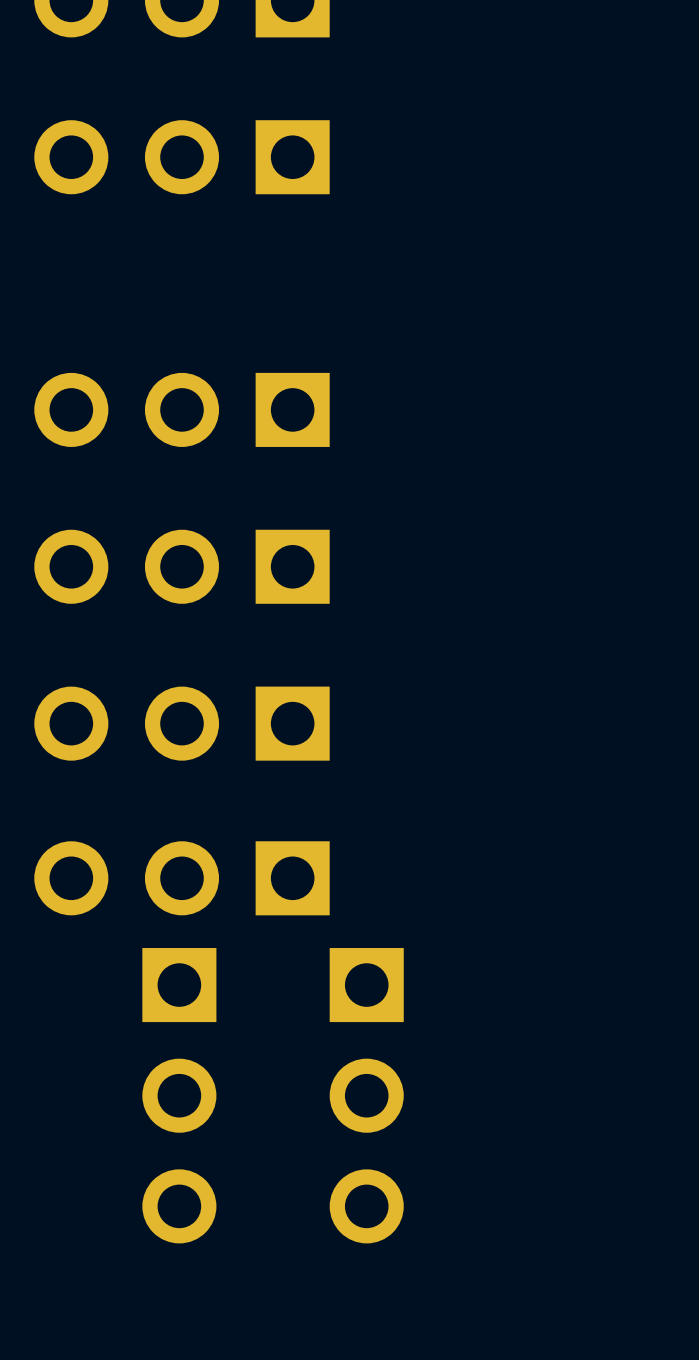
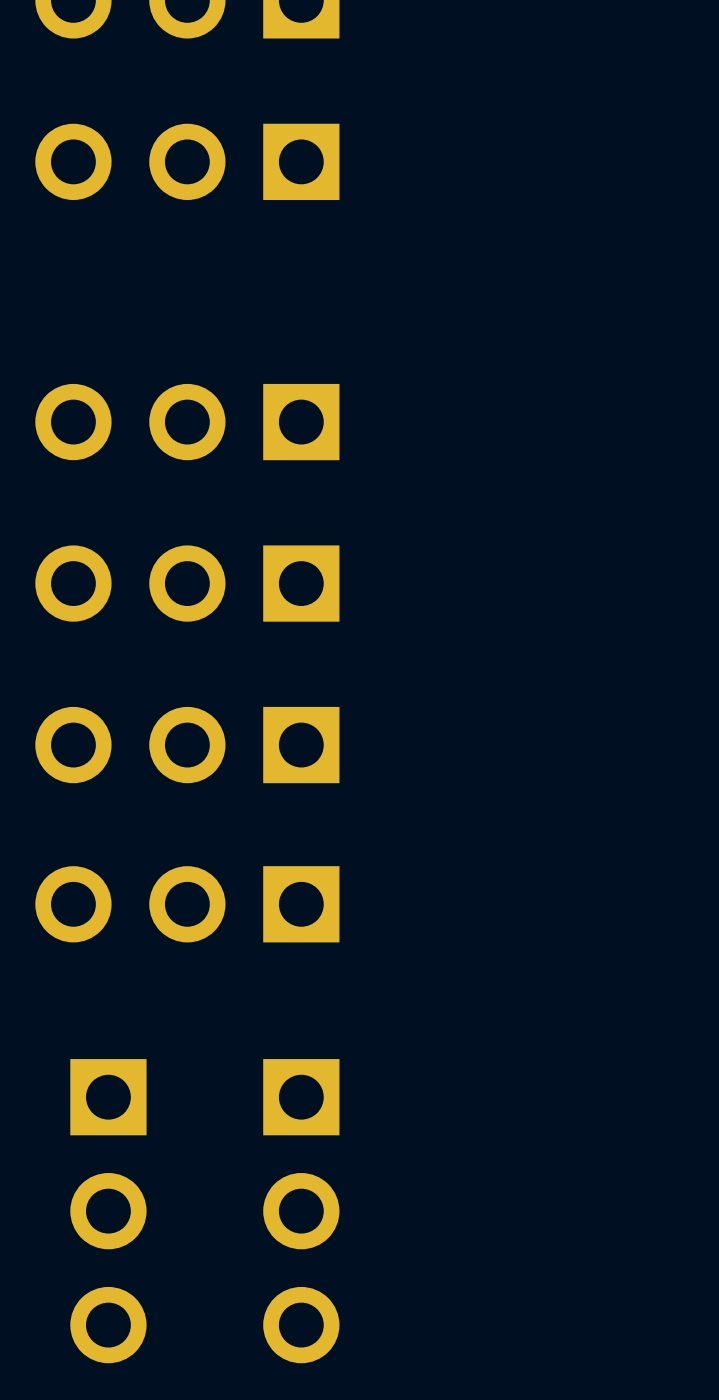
part: (179, 1095) -> none
part: (366, 1095) -> none
part: none -> (108, 1211)
part: none -> (301, 1211)

